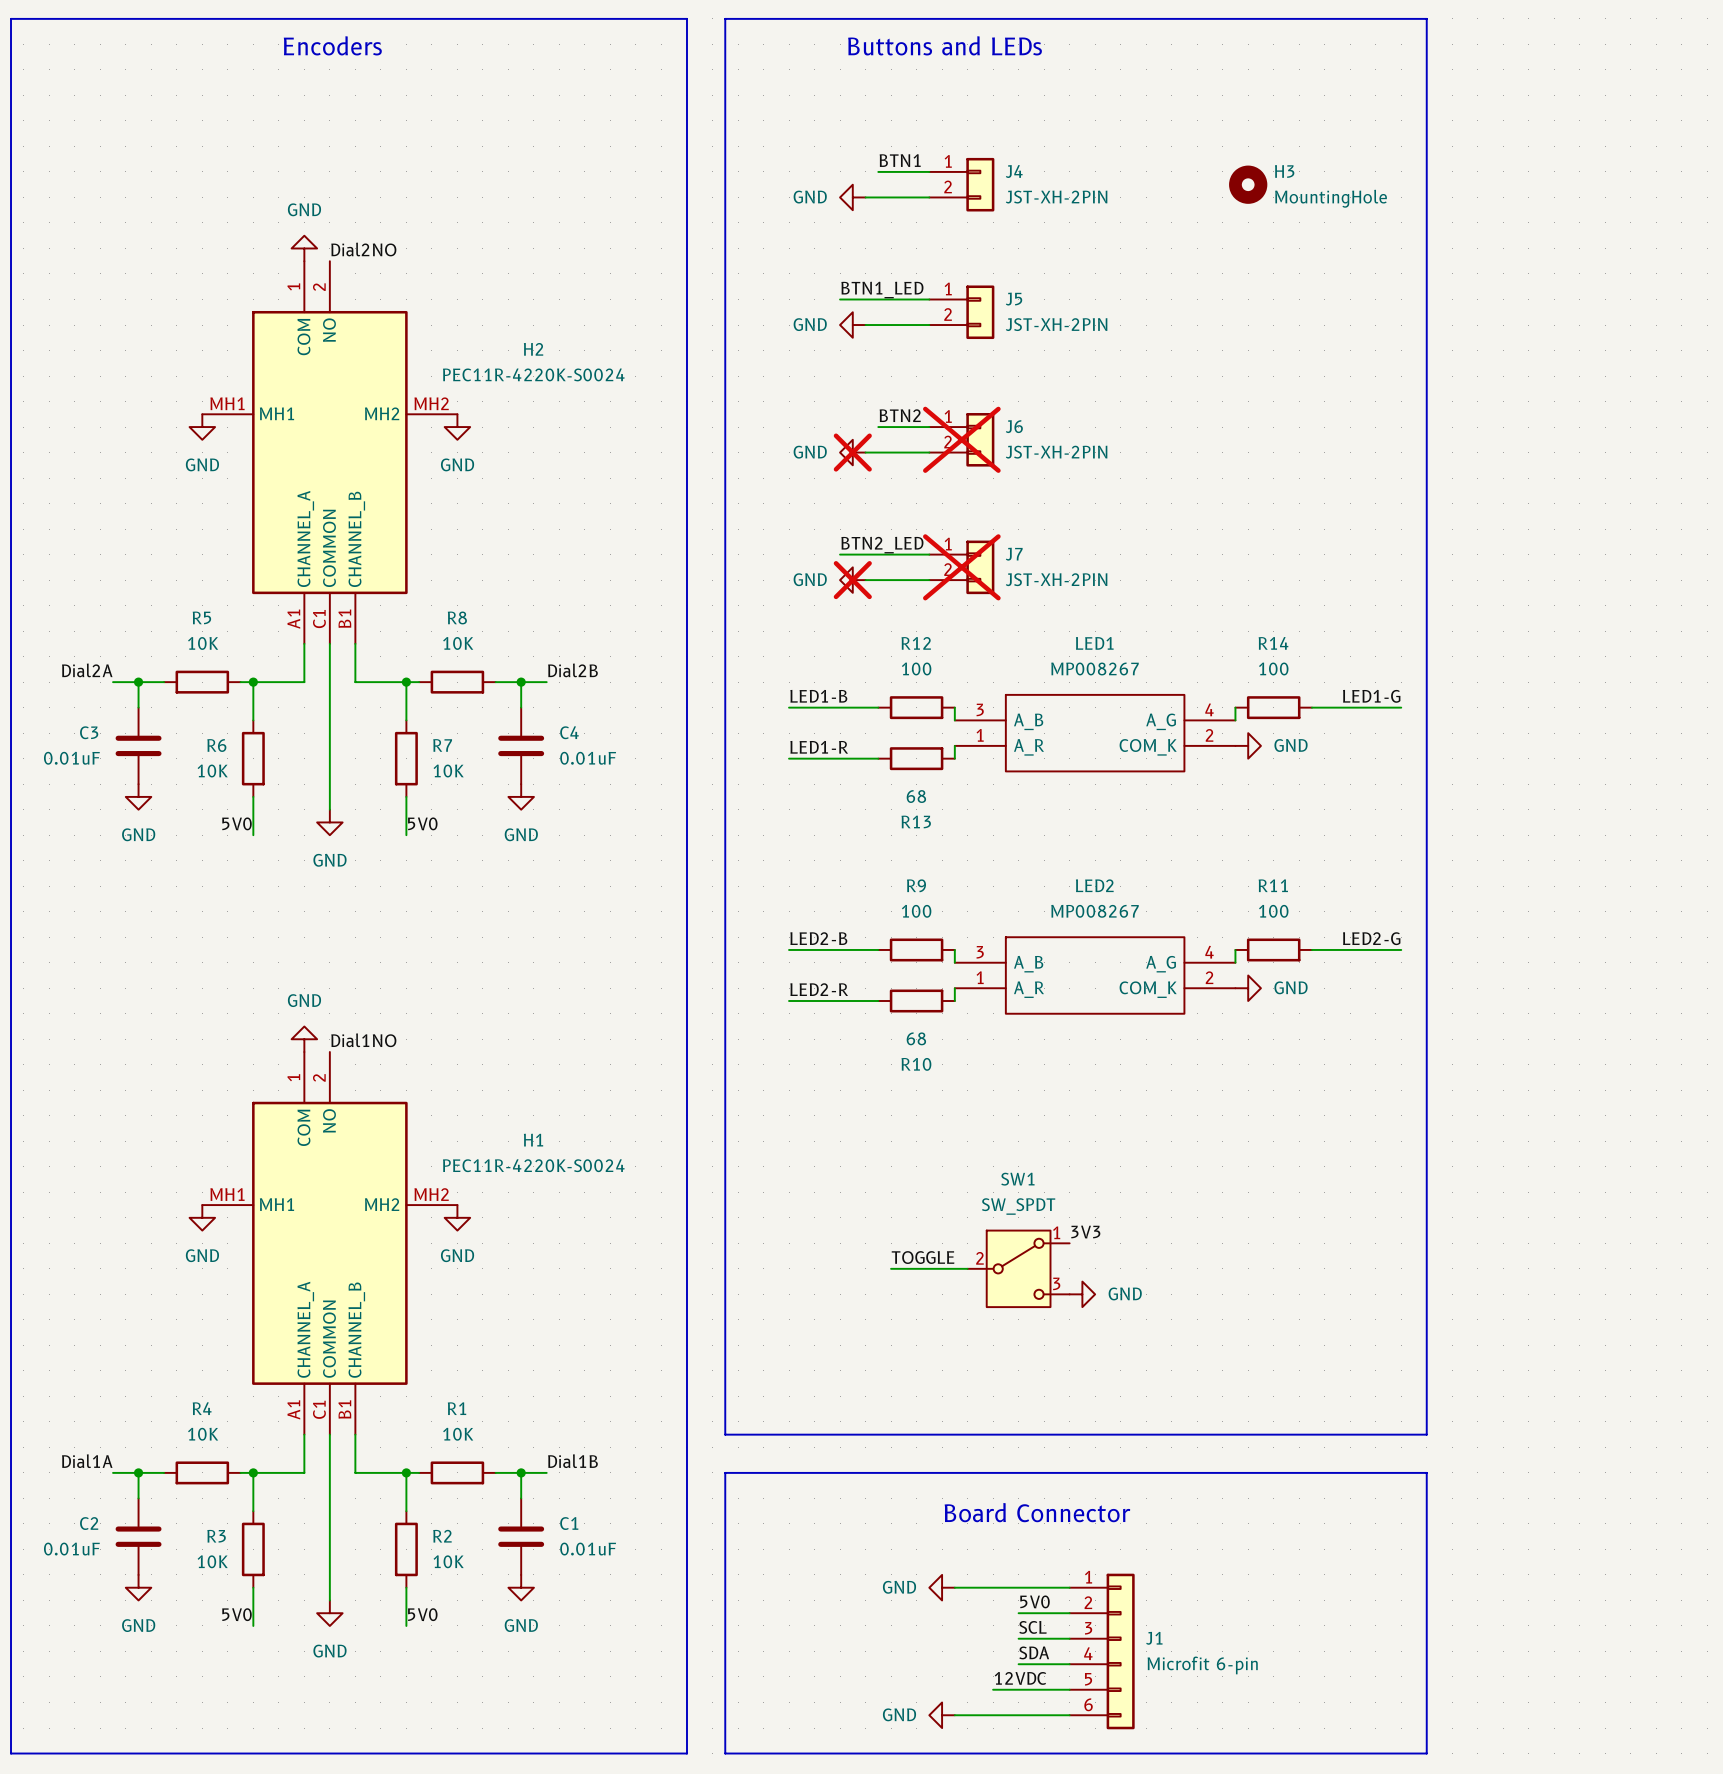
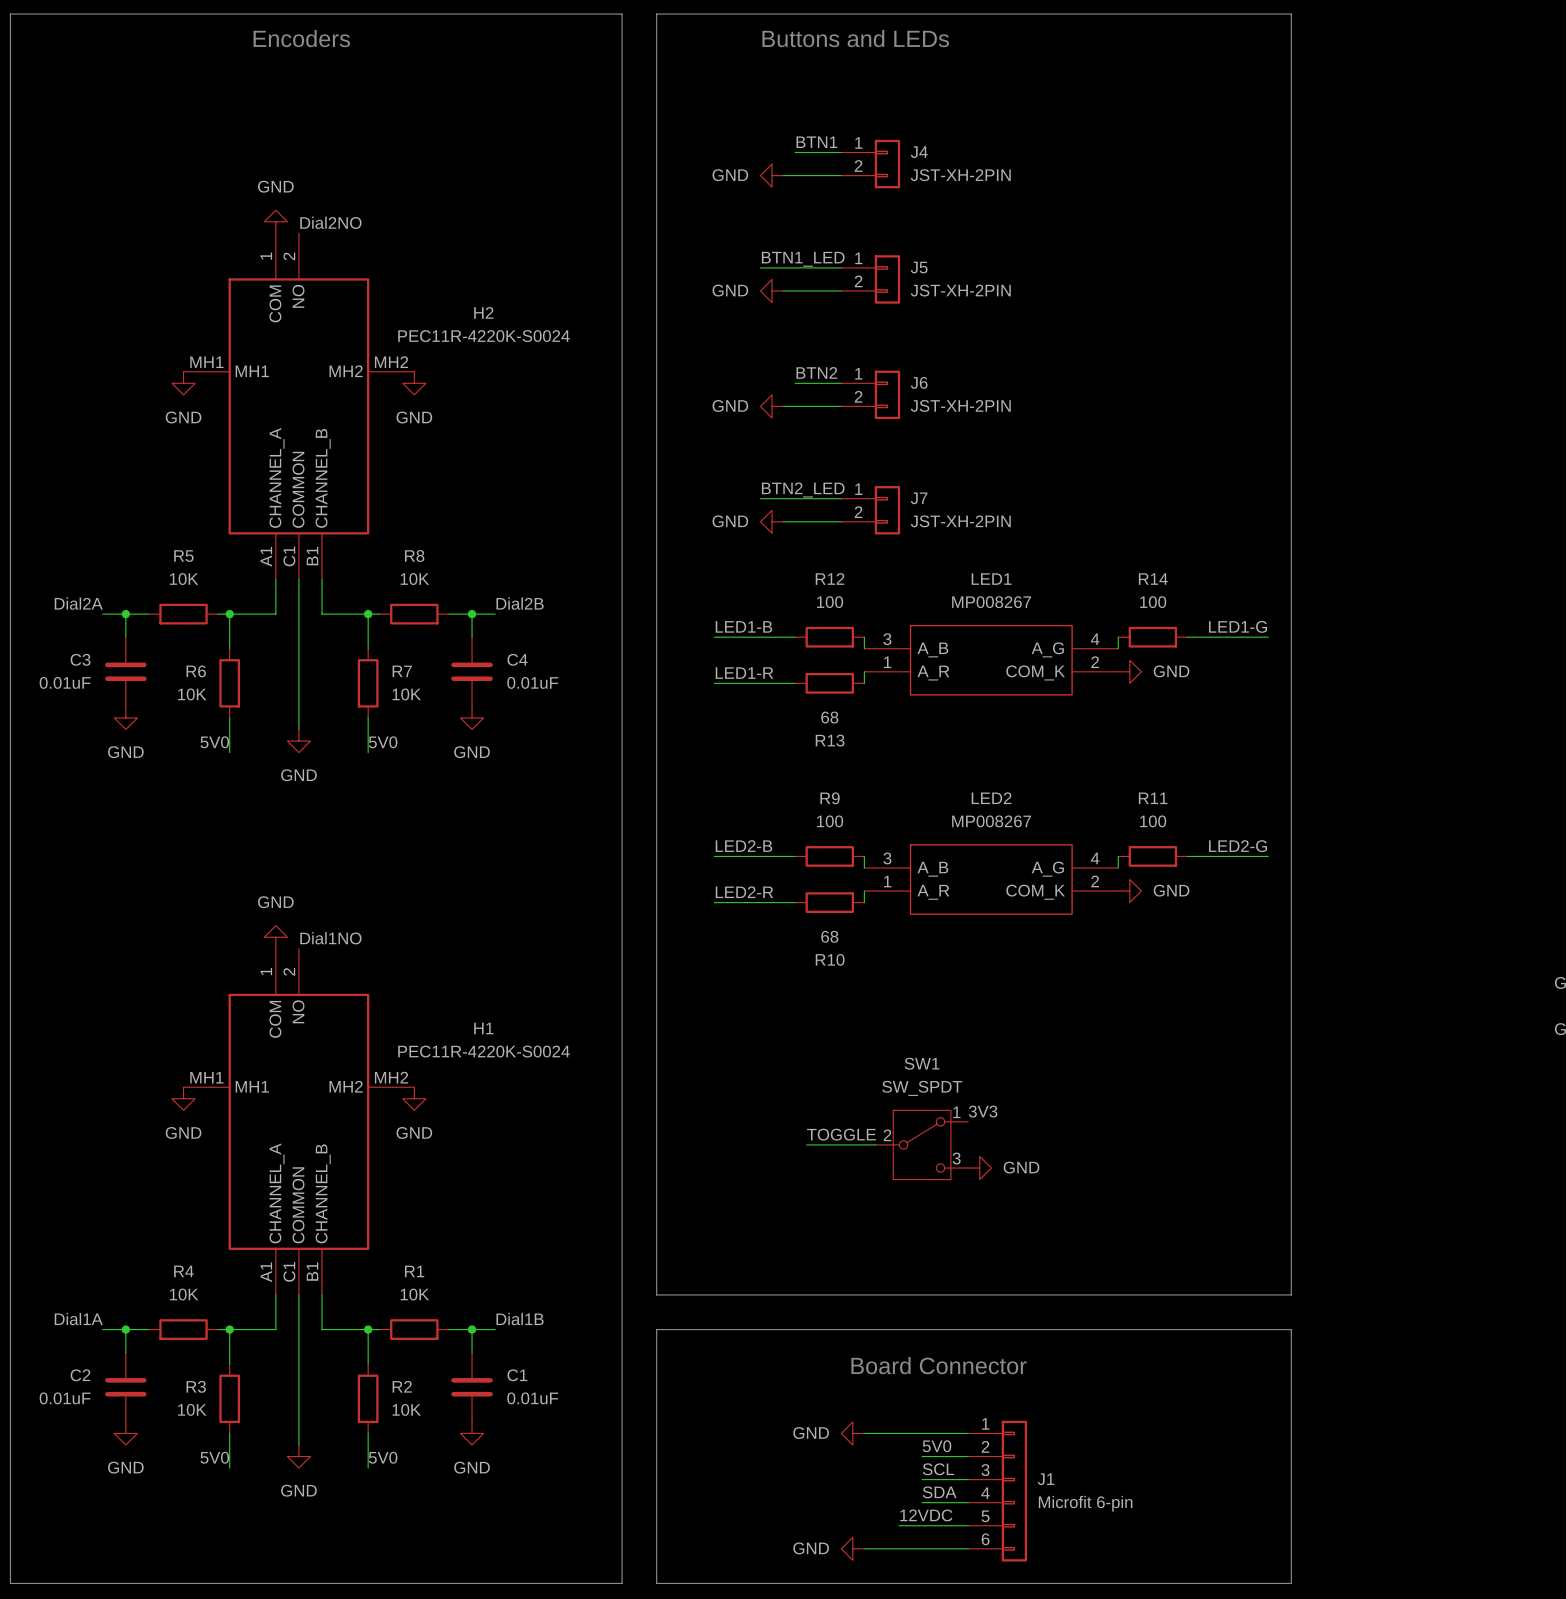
H3: MountingHole (1248, 184) -> none
J6 do-not-place cross: (961, 439) -> none
power symbol do-not-place cross: (852, 452) -> none
J7 do-not-place cross: (961, 567) -> none
power symbol do-not-place cross: (852, 580) -> none

